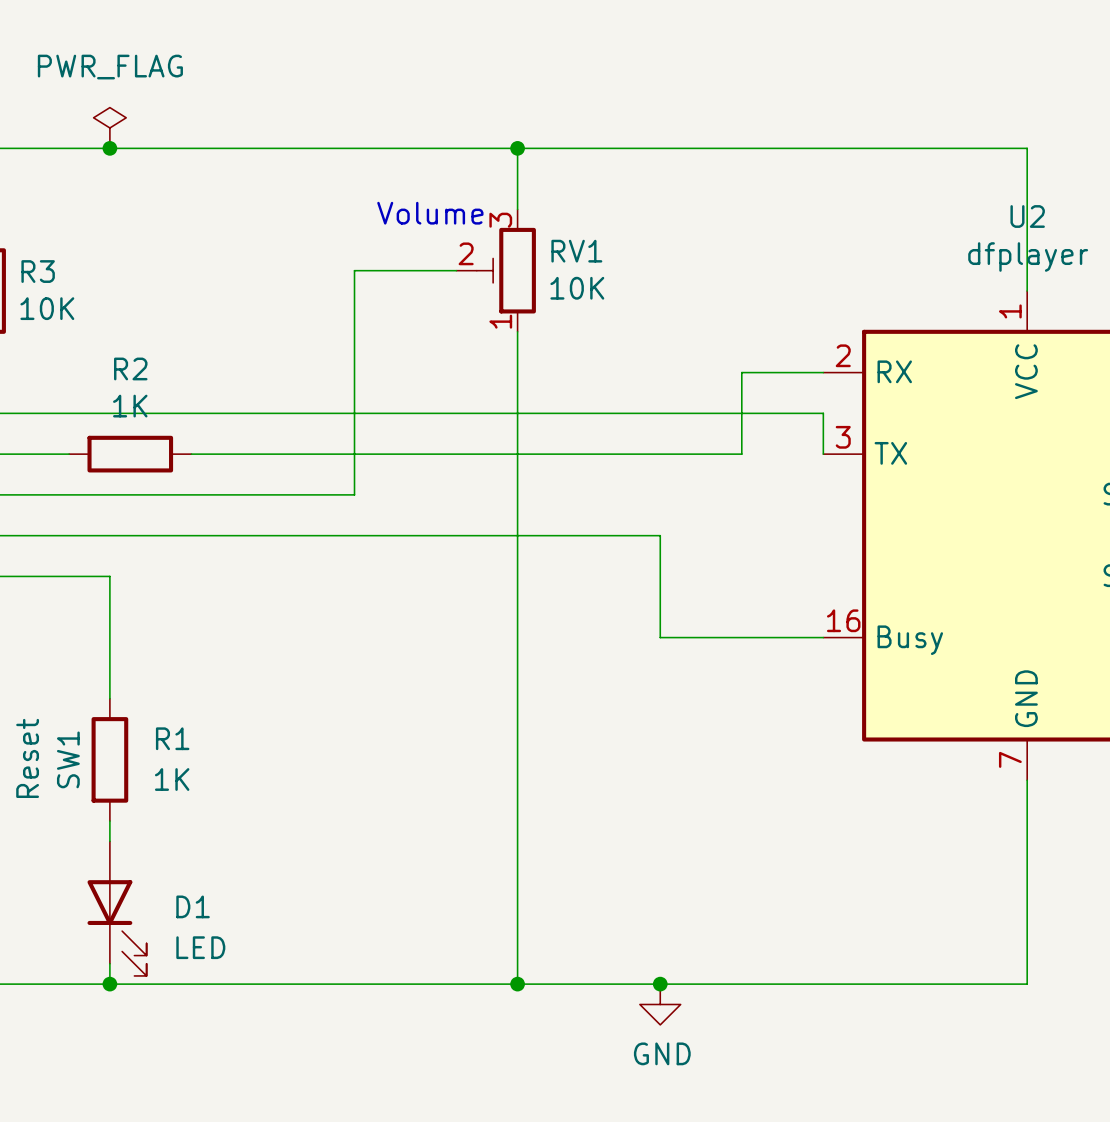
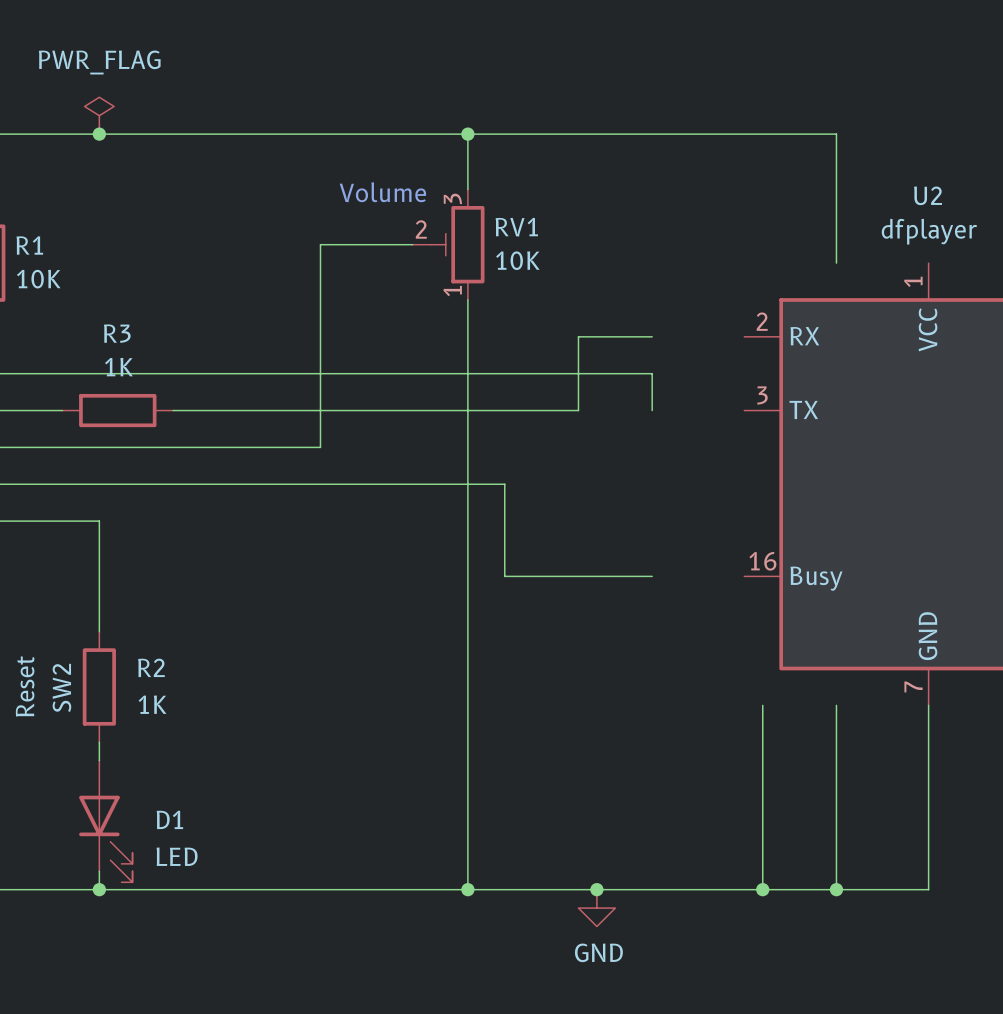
wire: (925, 148) (1027, 148) (1027, 291) -> (836, 134) (836, 263)
R3 name: R3 (38, 271) -> R1 (29, 245)
R2 name: R2 (130, 368) -> R3 (117, 333)
wire: (823, 372) (741, 372) (741, 454) (639, 454) -> (652, 336) (578, 336) (578, 410)
wire: (721, 413) (823, 413) (823, 454) -> (652, 373) (652, 410)
wire: (558, 535) (660, 535) (660, 637) -> (504, 484) (504, 576) (596, 576)
wire: (721, 637) (823, 637) -> none
R1 name: R1 (172, 738) -> R2 (151, 667)
SW1 name: SW1 (68, 759) -> SW2 (61, 687)
wire: none -> (762, 705) (762, 889)
wire: none -> (836, 705) (836, 889)
junction: none -> (762, 889)
junction: none -> (836, 889)

